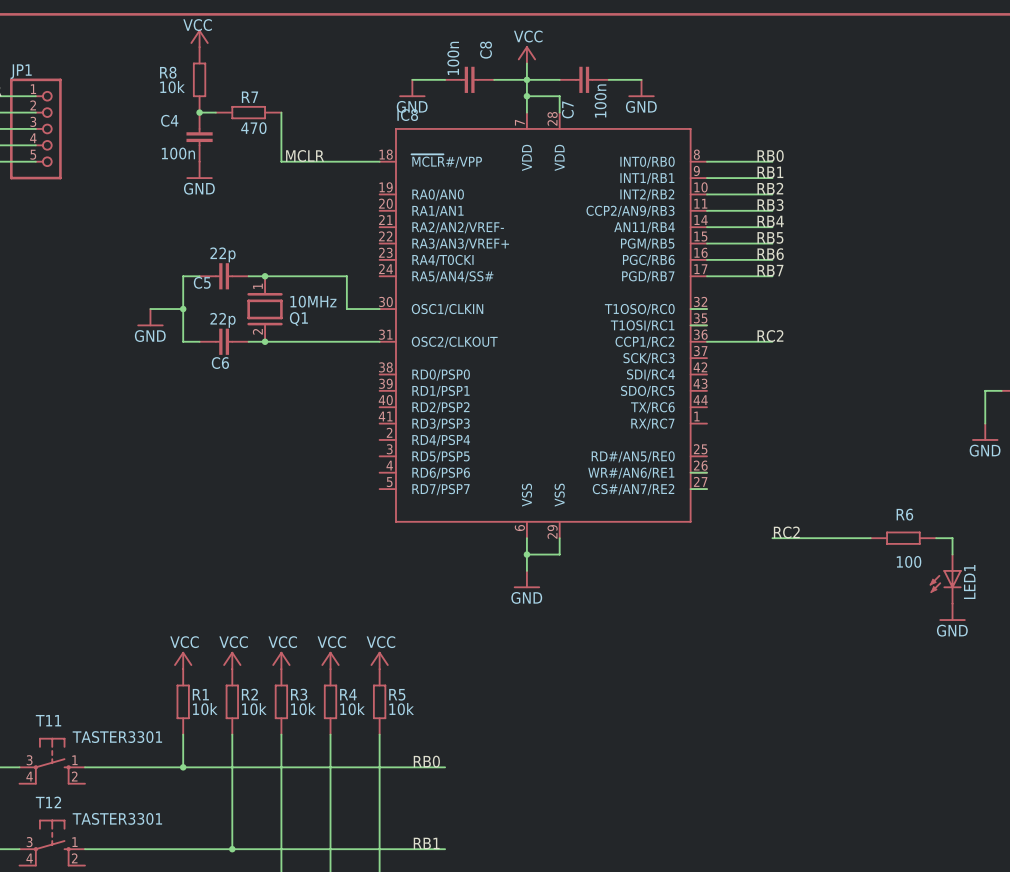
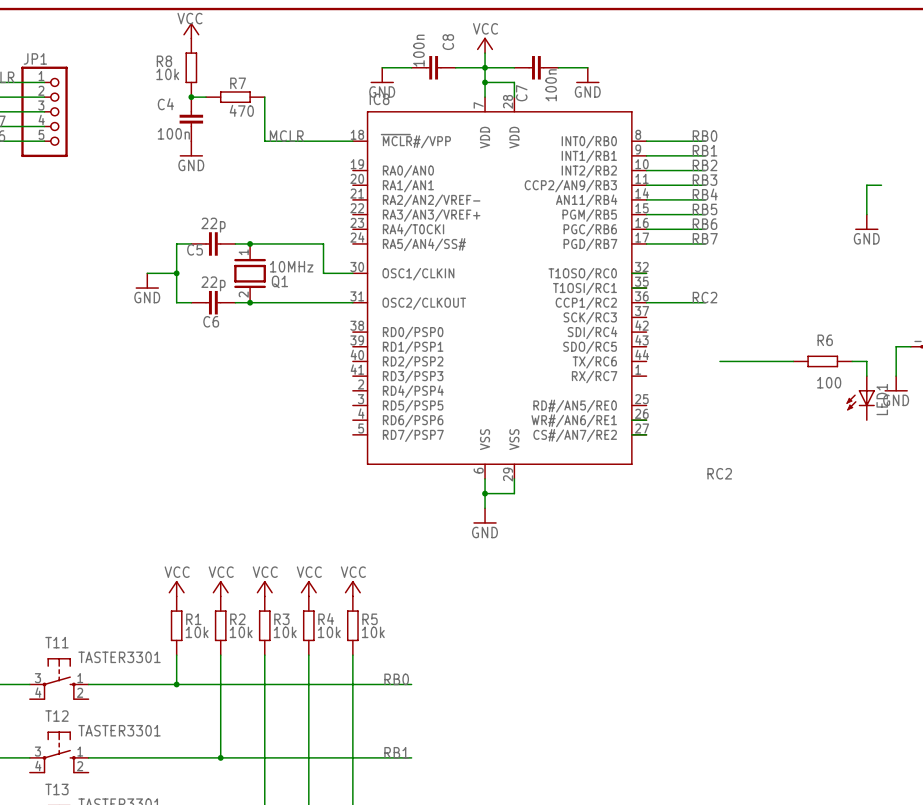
wire: none -> (881, 185) (866, 185) (866, 214)
power symbol: none -> GND (866, 222)
wire: none -> (719, 361) (793, 361)
wire: (772, 538) (870, 538) -> none
R6 position: (903, 538) -> (822, 361)
wire: (936, 538) (952, 538) (952, 554) -> (852, 361) (866, 361) (866, 376)
LED1 position: (945, 579) -> (860, 398)
power symbol: GND (952, 612) -> none

